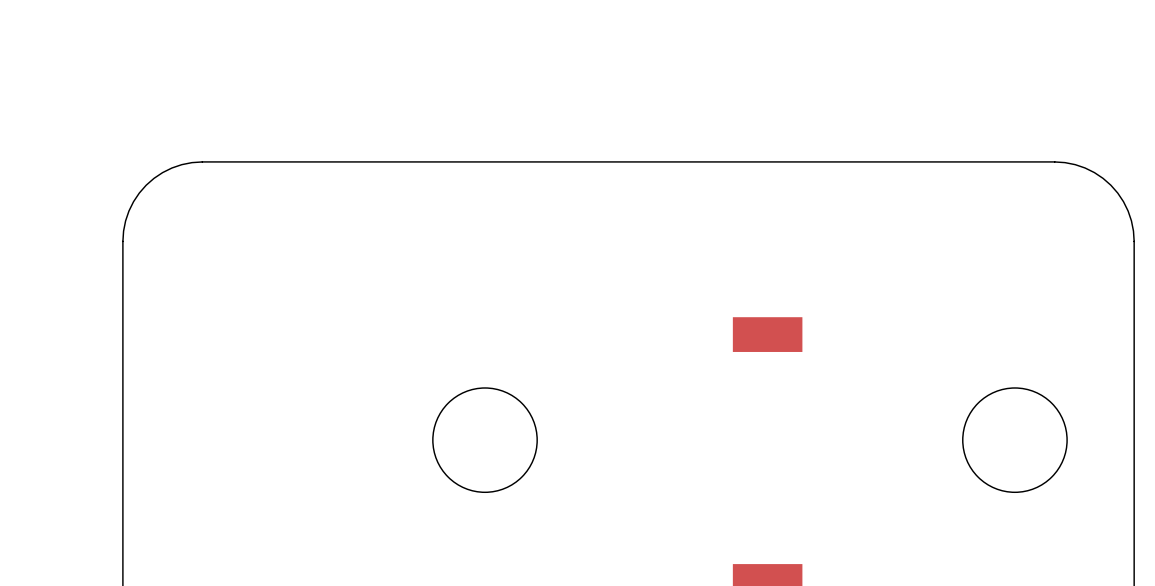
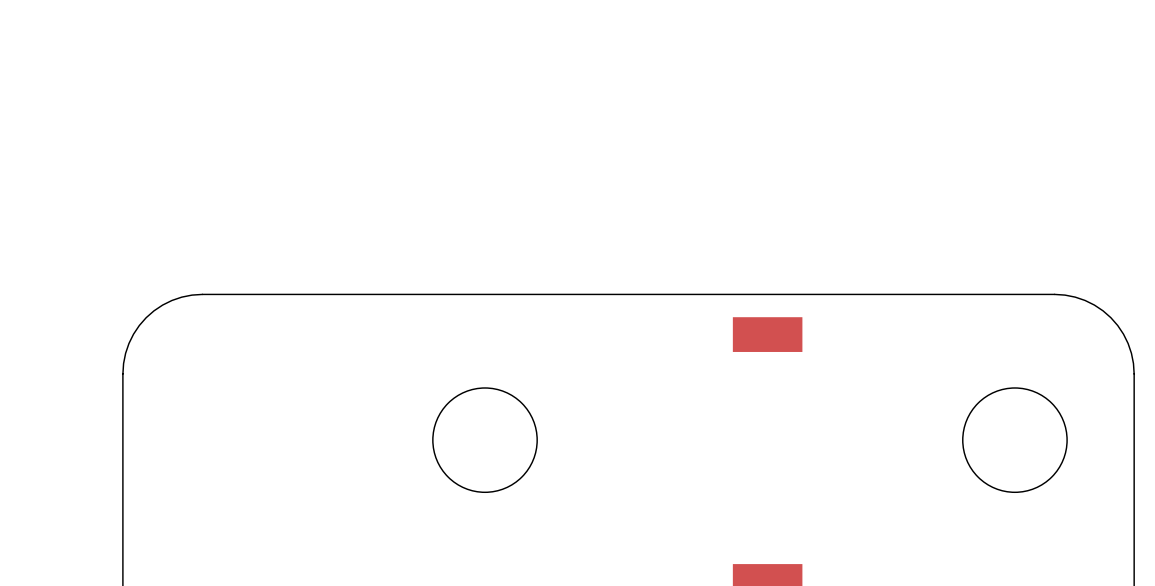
board edge: (1134, 373) (1134, 241) (1128, 211) (1117, 193) (1103, 178) (1085, 167) (1054, 161) (202, 161) (181, 164) (162, 172) (146, 185) (133, 201) (125, 220) (122, 241) (122, 373) -> (1134, 373) (1128, 343) (1110, 317) (1085, 300) (1054, 294) (192, 295) (162, 305) (139, 325) (128, 343) (122, 373)

